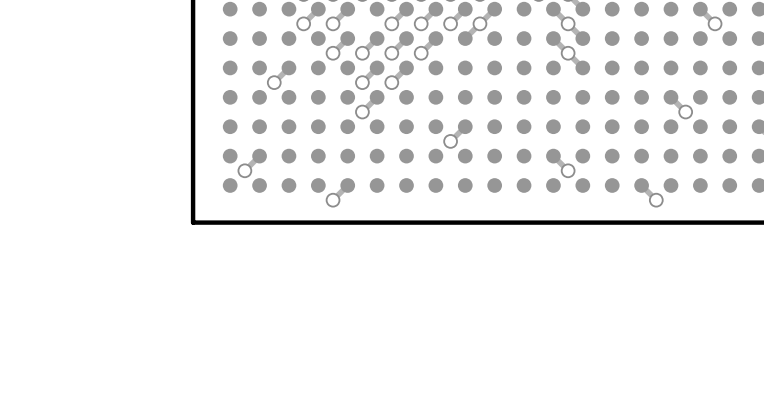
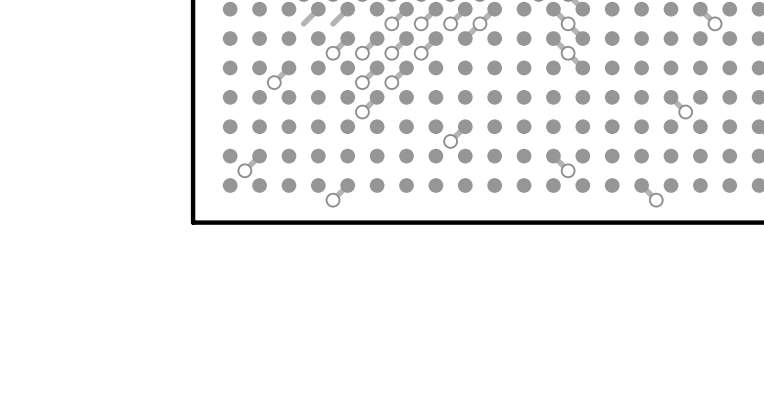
via: (303, 23) -> none
via: (333, 23) -> none

